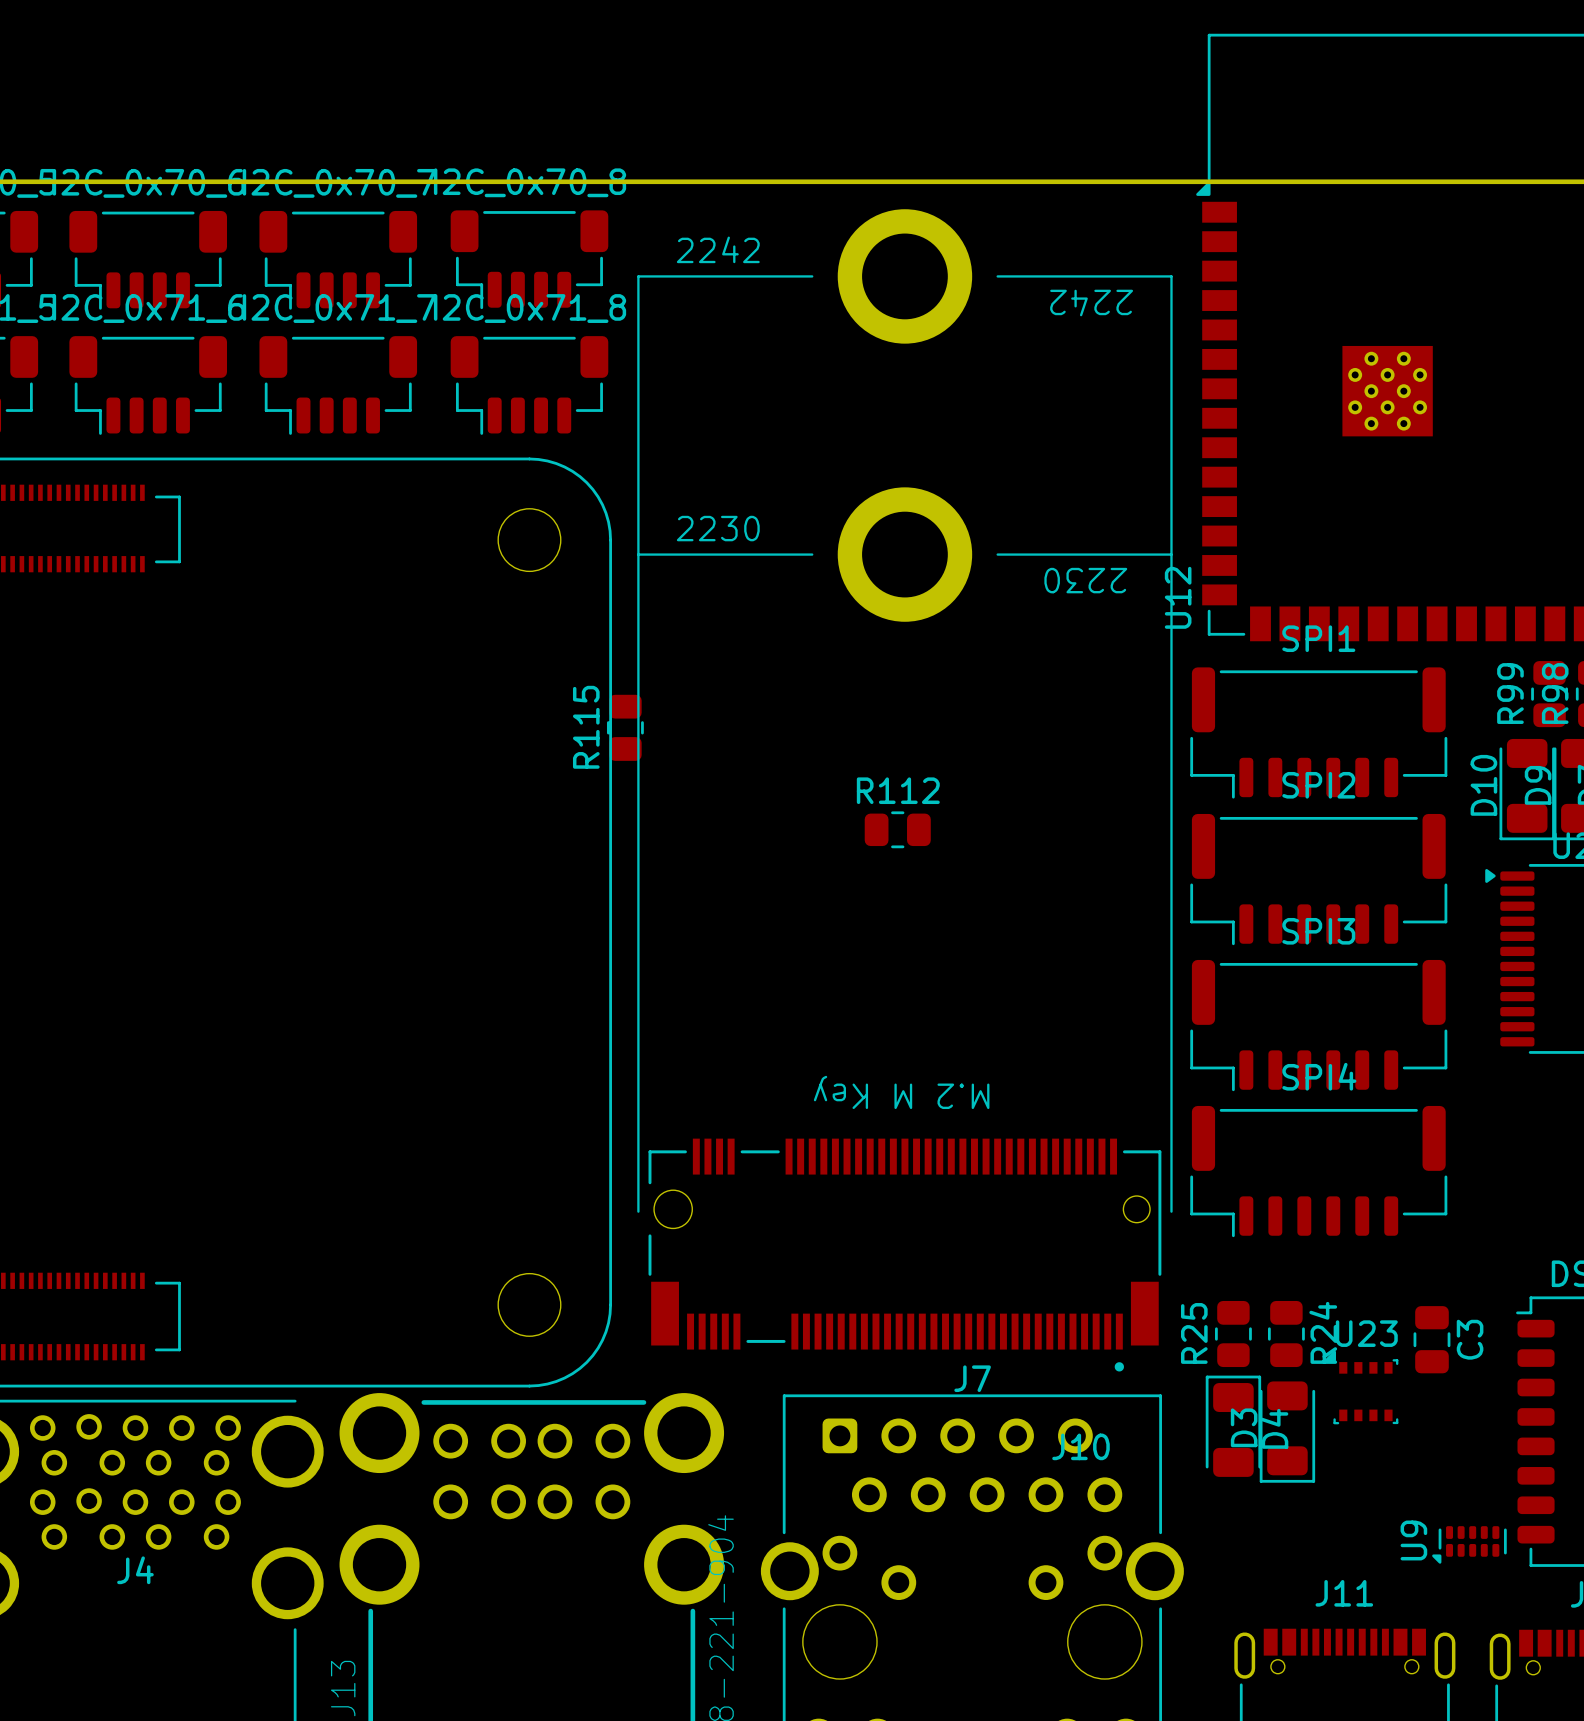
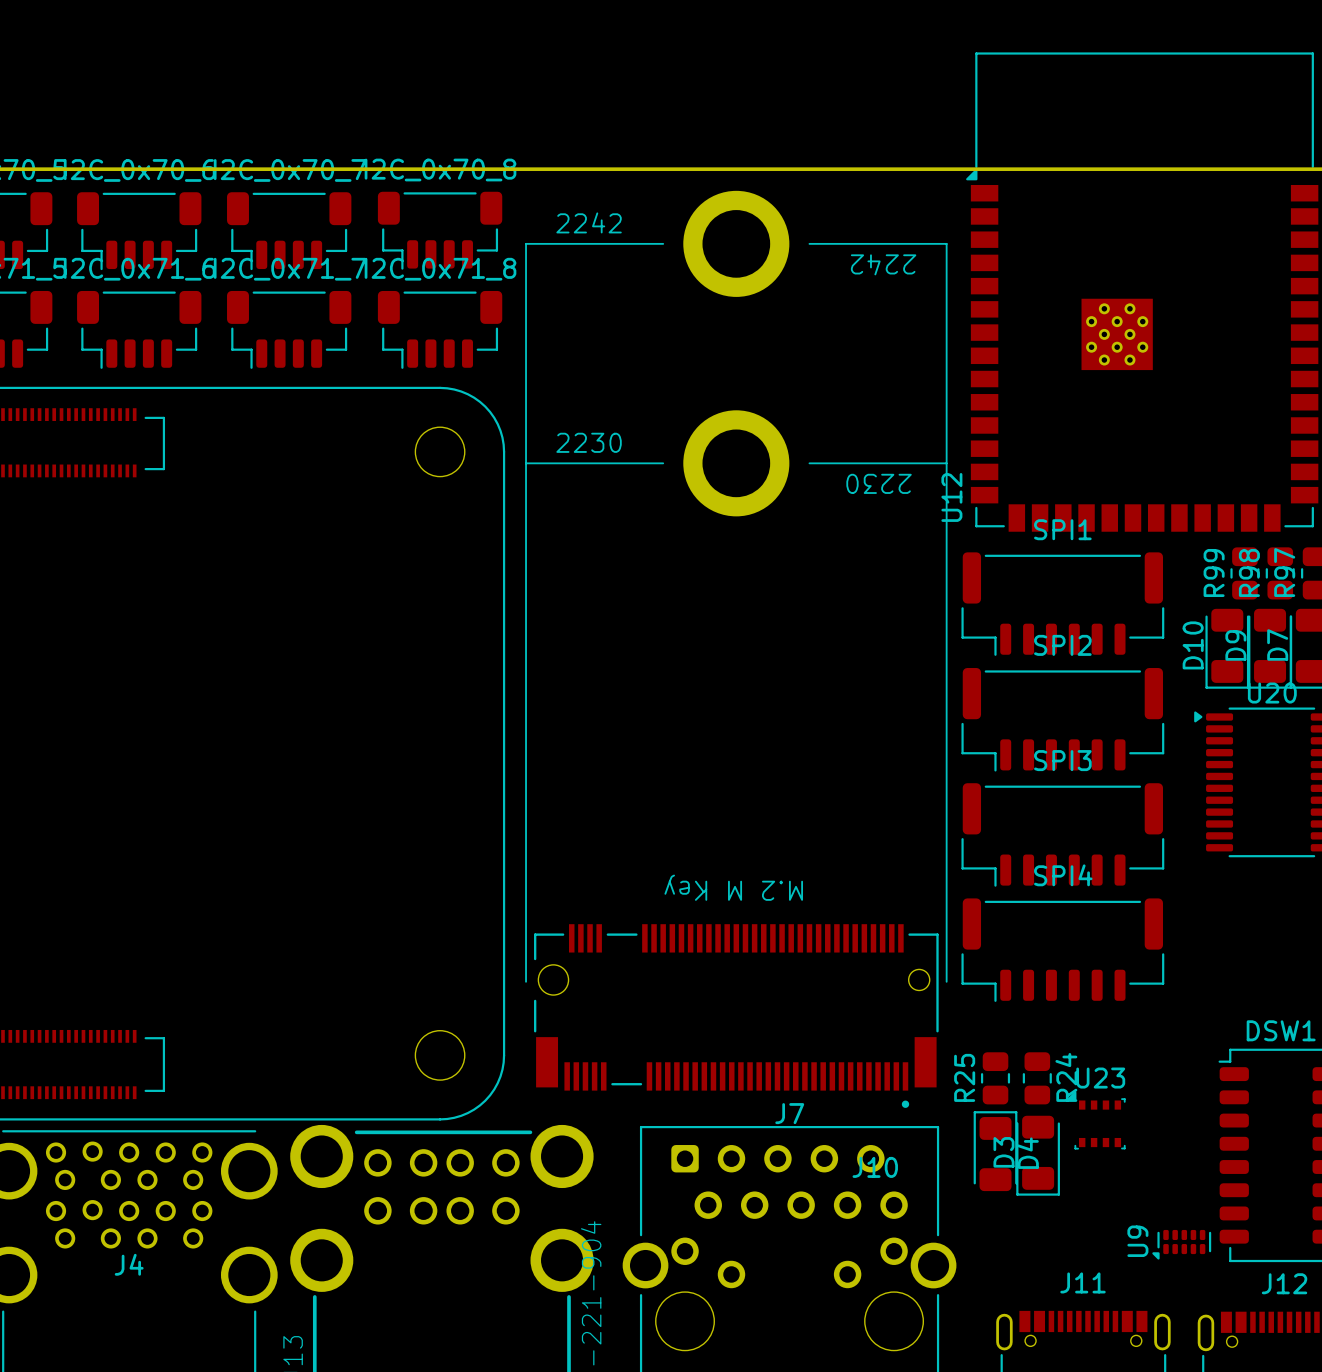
R115: (625, 727) -> none
R112: (897, 829) -> none
C3: (1431, 1339) -> none

